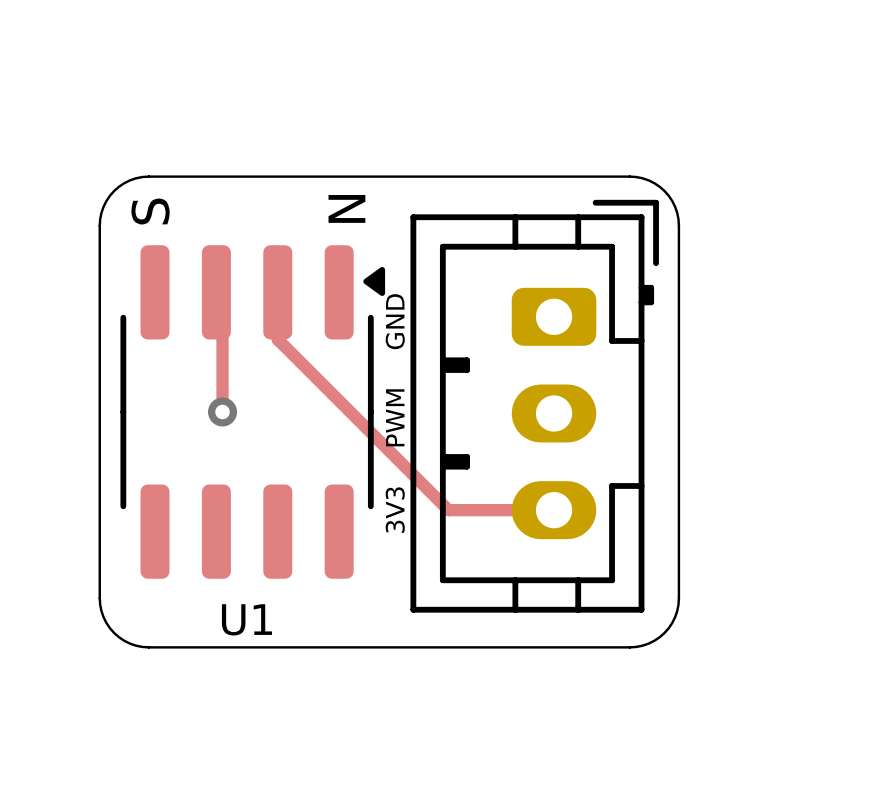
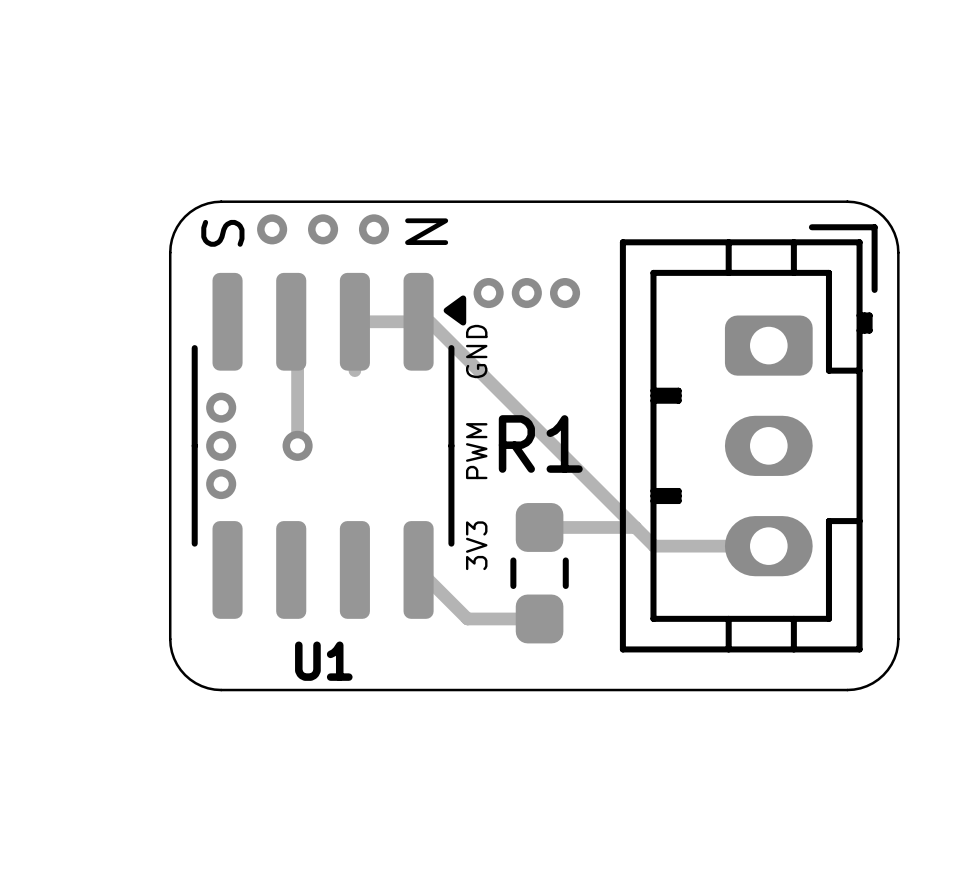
board edge: (629, 176) (648, 180) (664, 190) (675, 206) (678, 225) (678, 604) (672, 622) (664, 632) (648, 643) (629, 647) -> (720, 201) (847, 201) (860, 203) (872, 208) (887, 221) (896, 239) (898, 252) (898, 639) (894, 658) (887, 670) (878, 679) (866, 686) (854, 689) (720, 690)
via: none -> (272, 229)
via: none -> (323, 229)
via: none -> (374, 229)
via: none -> (488, 293)
via: none -> (526, 293)
via: none -> (565, 293)
track: none -> (354, 321) (429, 321) (654, 546)
track: (277, 339) (448, 510) (554, 510) -> none
via: none -> (221, 407)
part position: (534, 406) -> (748, 438)
via: none -> (221, 445)
via: none -> (221, 484)
track: none -> (539, 527) (635, 527) (654, 546)
track: none -> (654, 546) (768, 546)
track: none -> (418, 569) (467, 618) (539, 618)
R1: none -> (539, 573)

